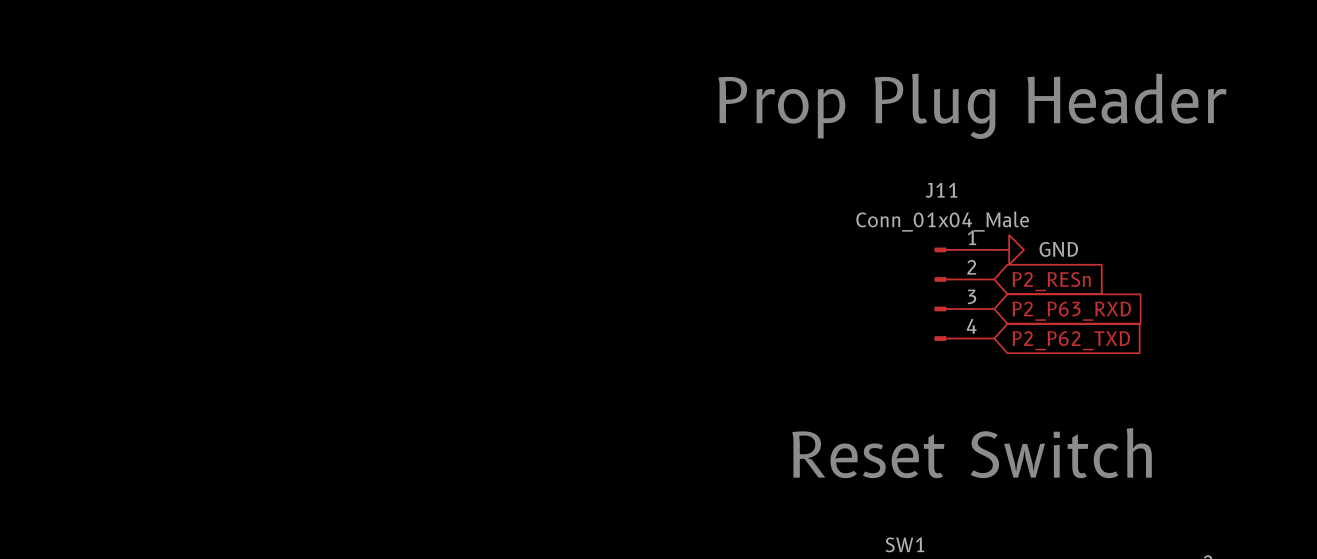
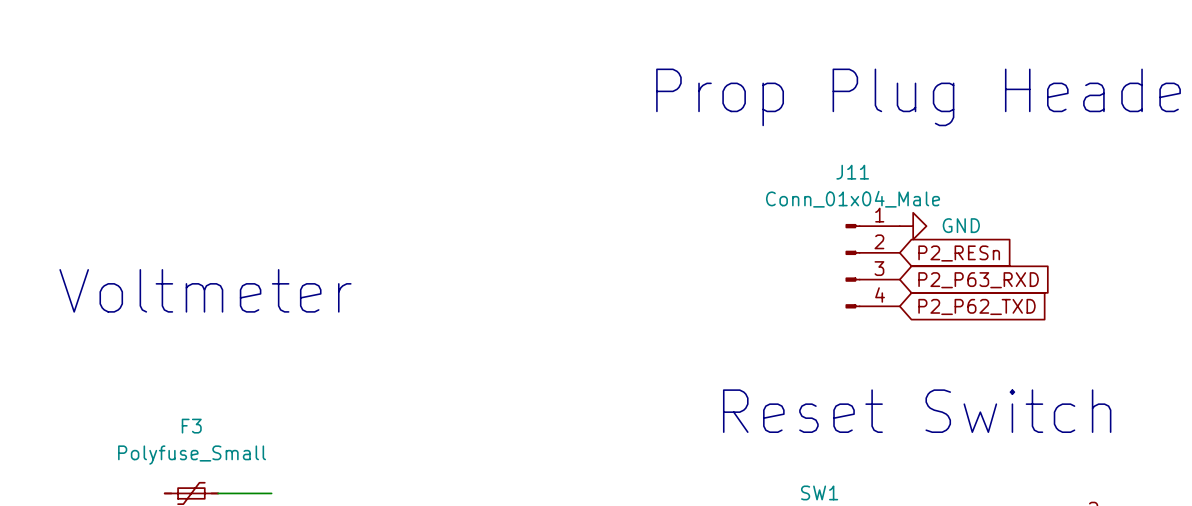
text: none -> Voltmeter (205, 290)
F3: none -> Polyfuse_Small (191, 493)
wire: none -> (218, 493) (271, 493)

